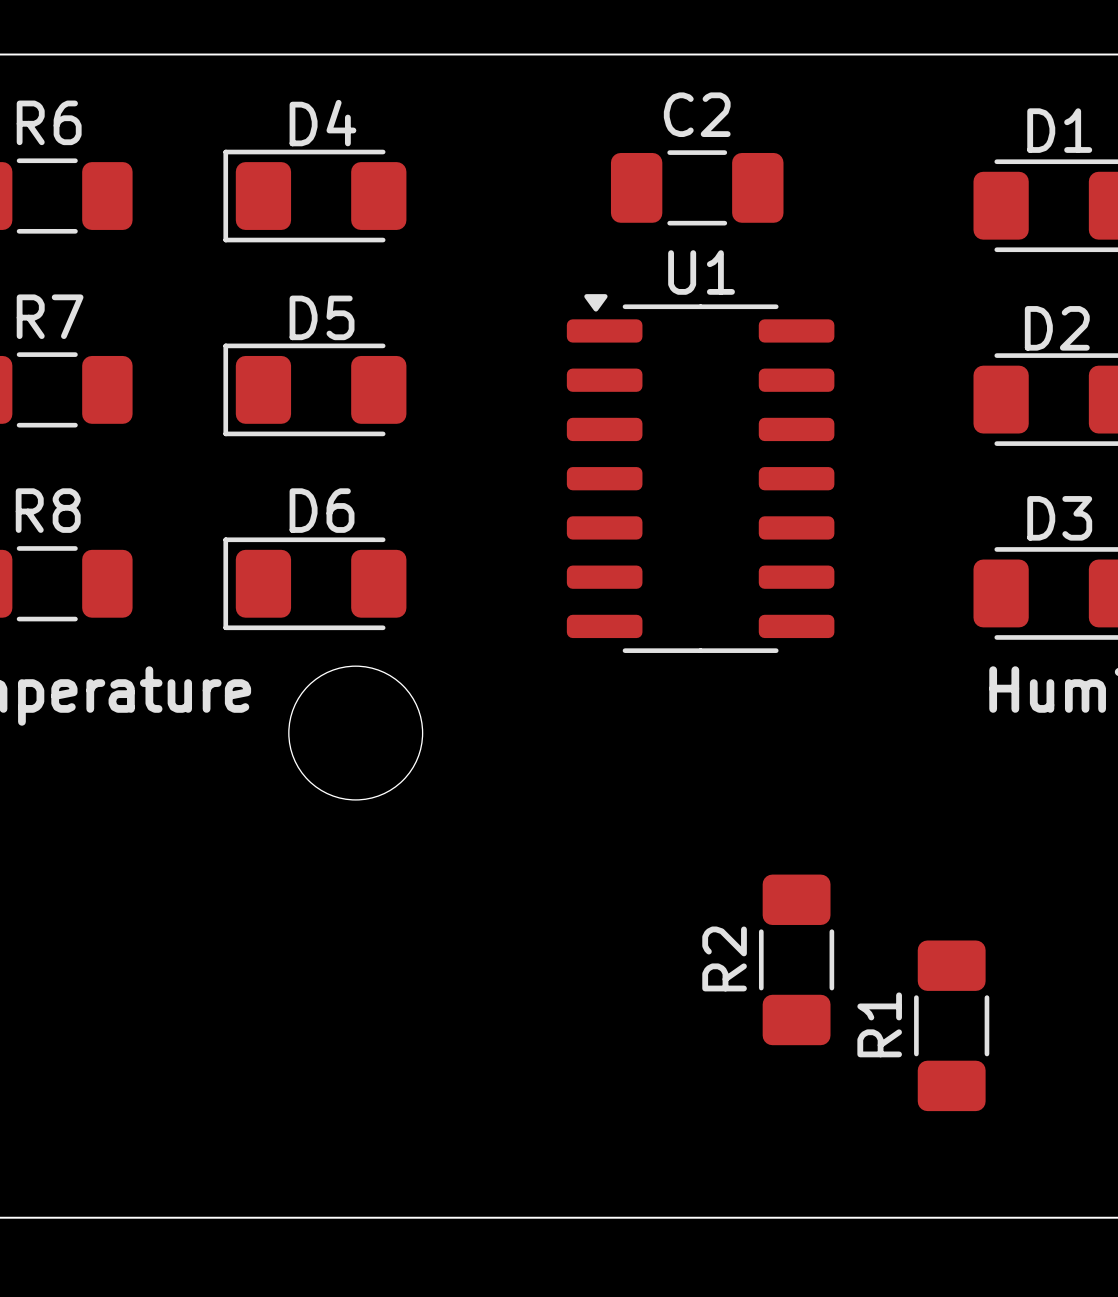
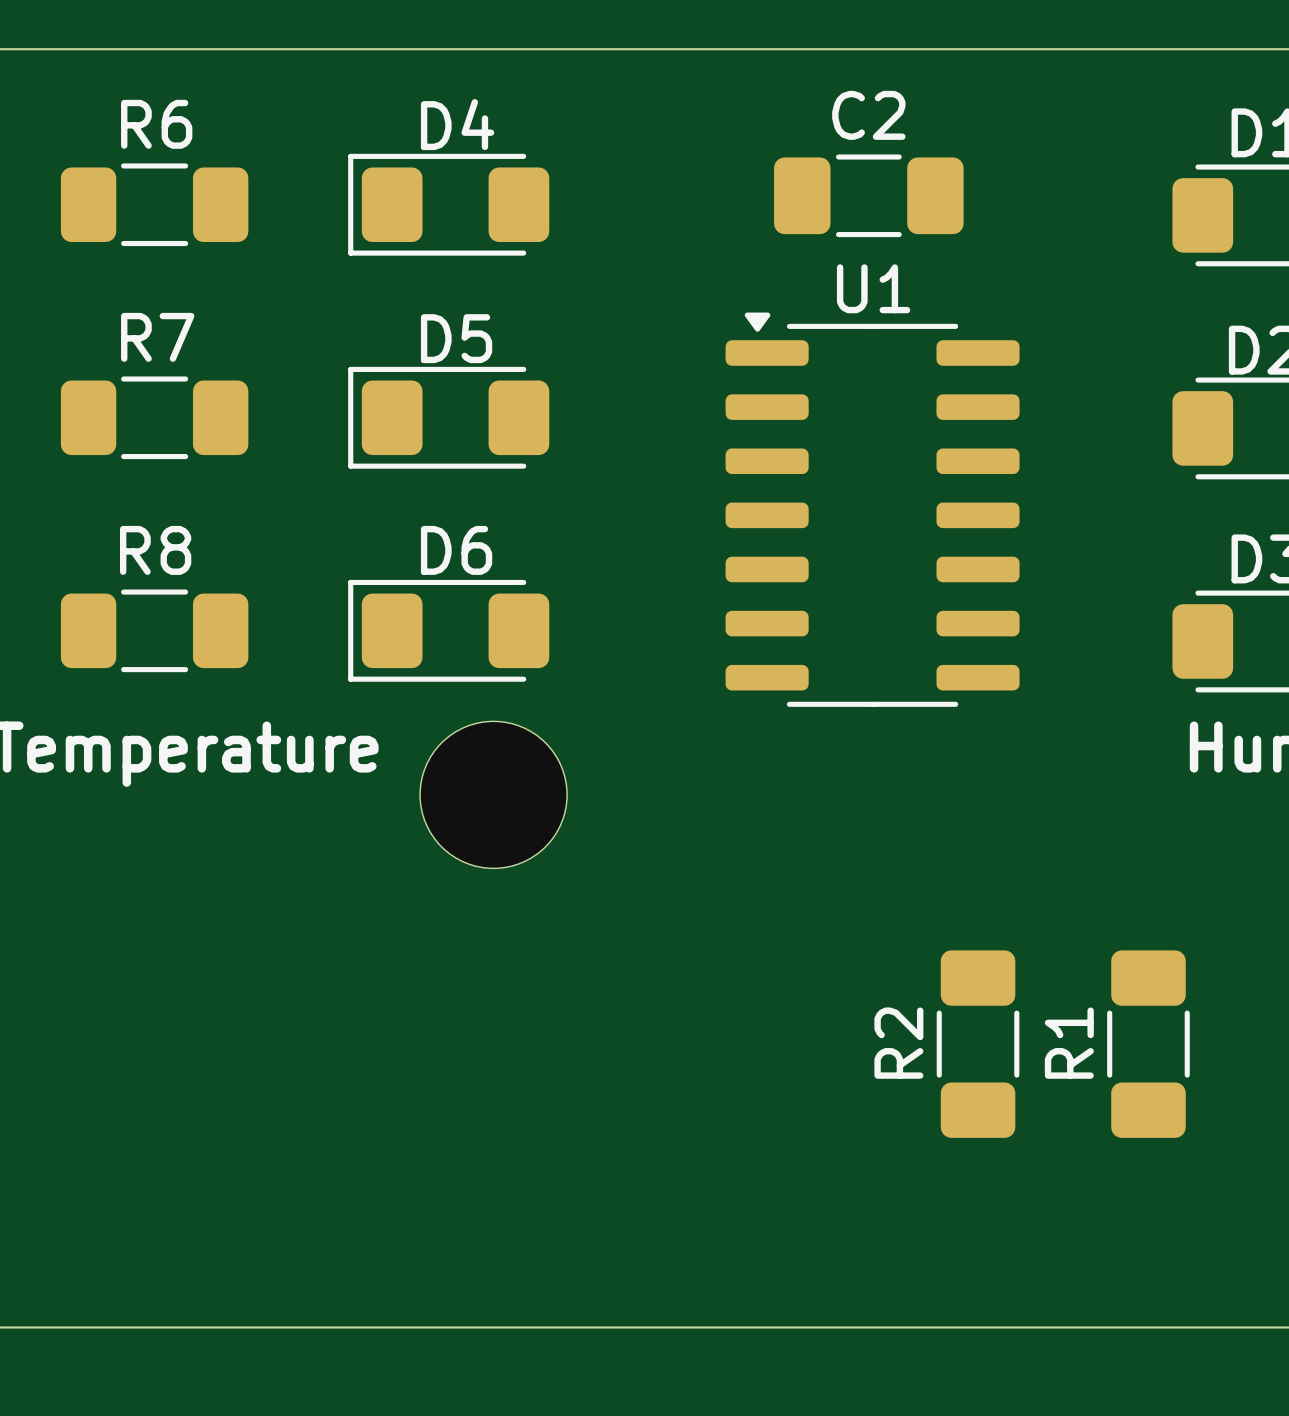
R1 position: (951, 1025) -> (1148, 1044)

